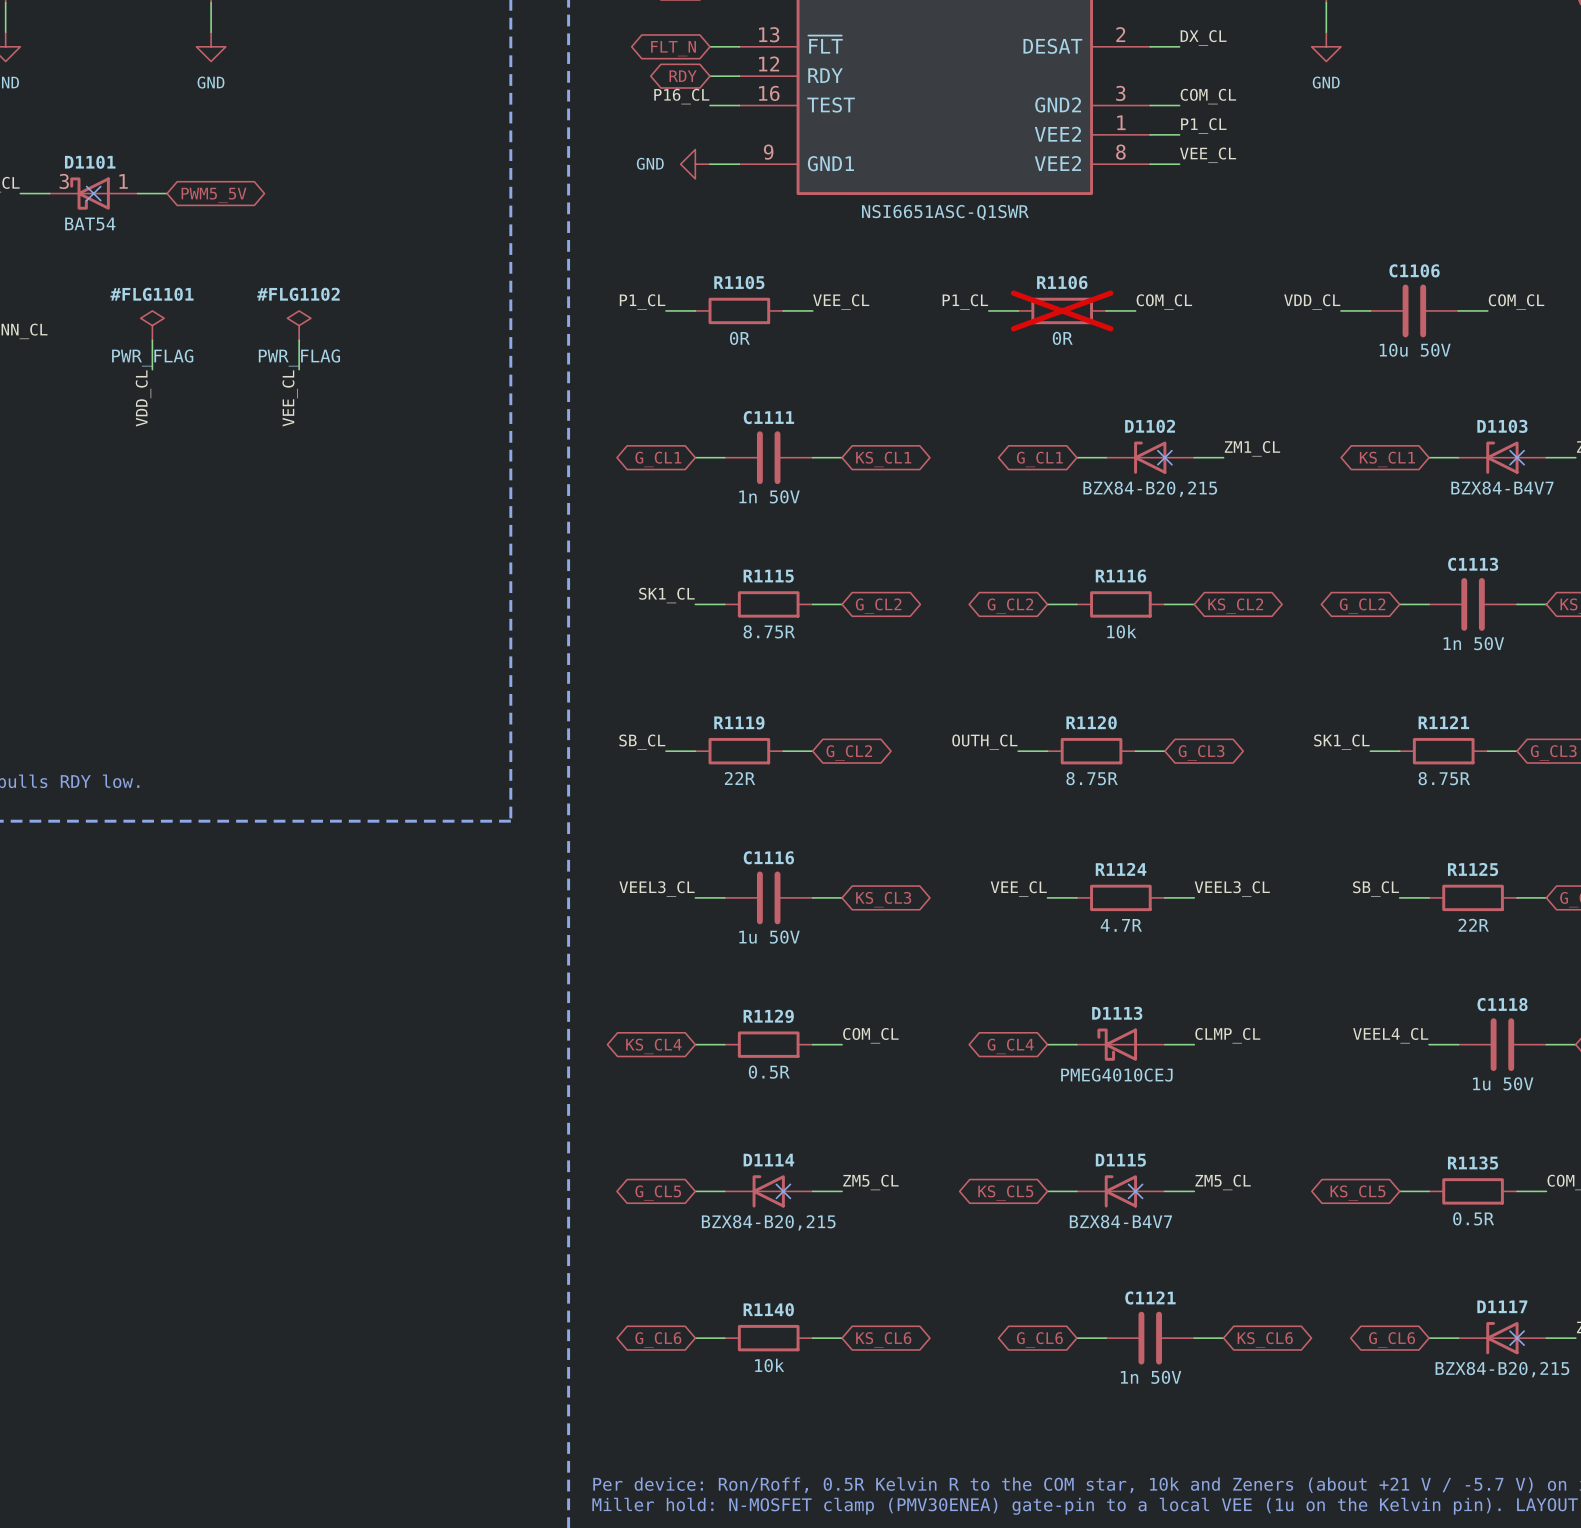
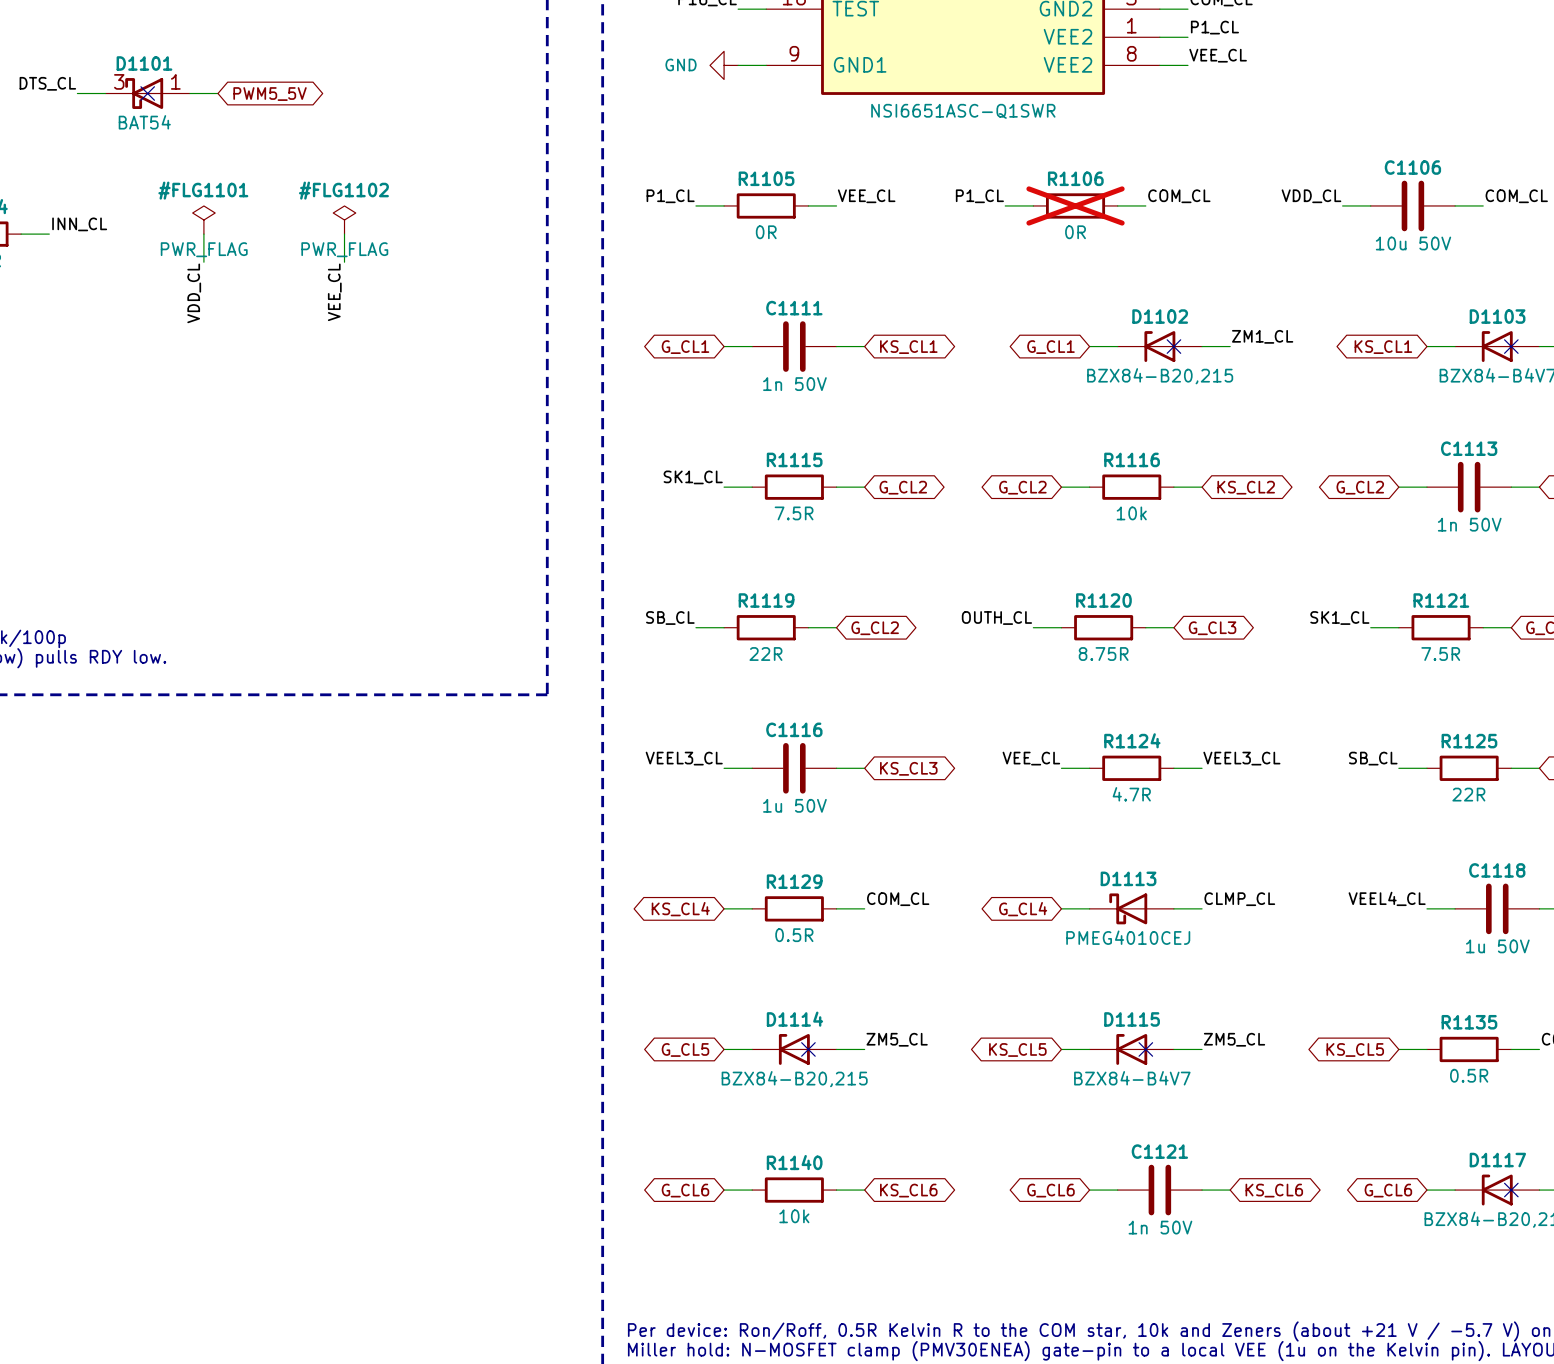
R1115 value: 8.75R (769, 631) -> 7.5R (794, 513)
R1121 value: 8.75R (1444, 778) -> 7.5R (1440, 654)

